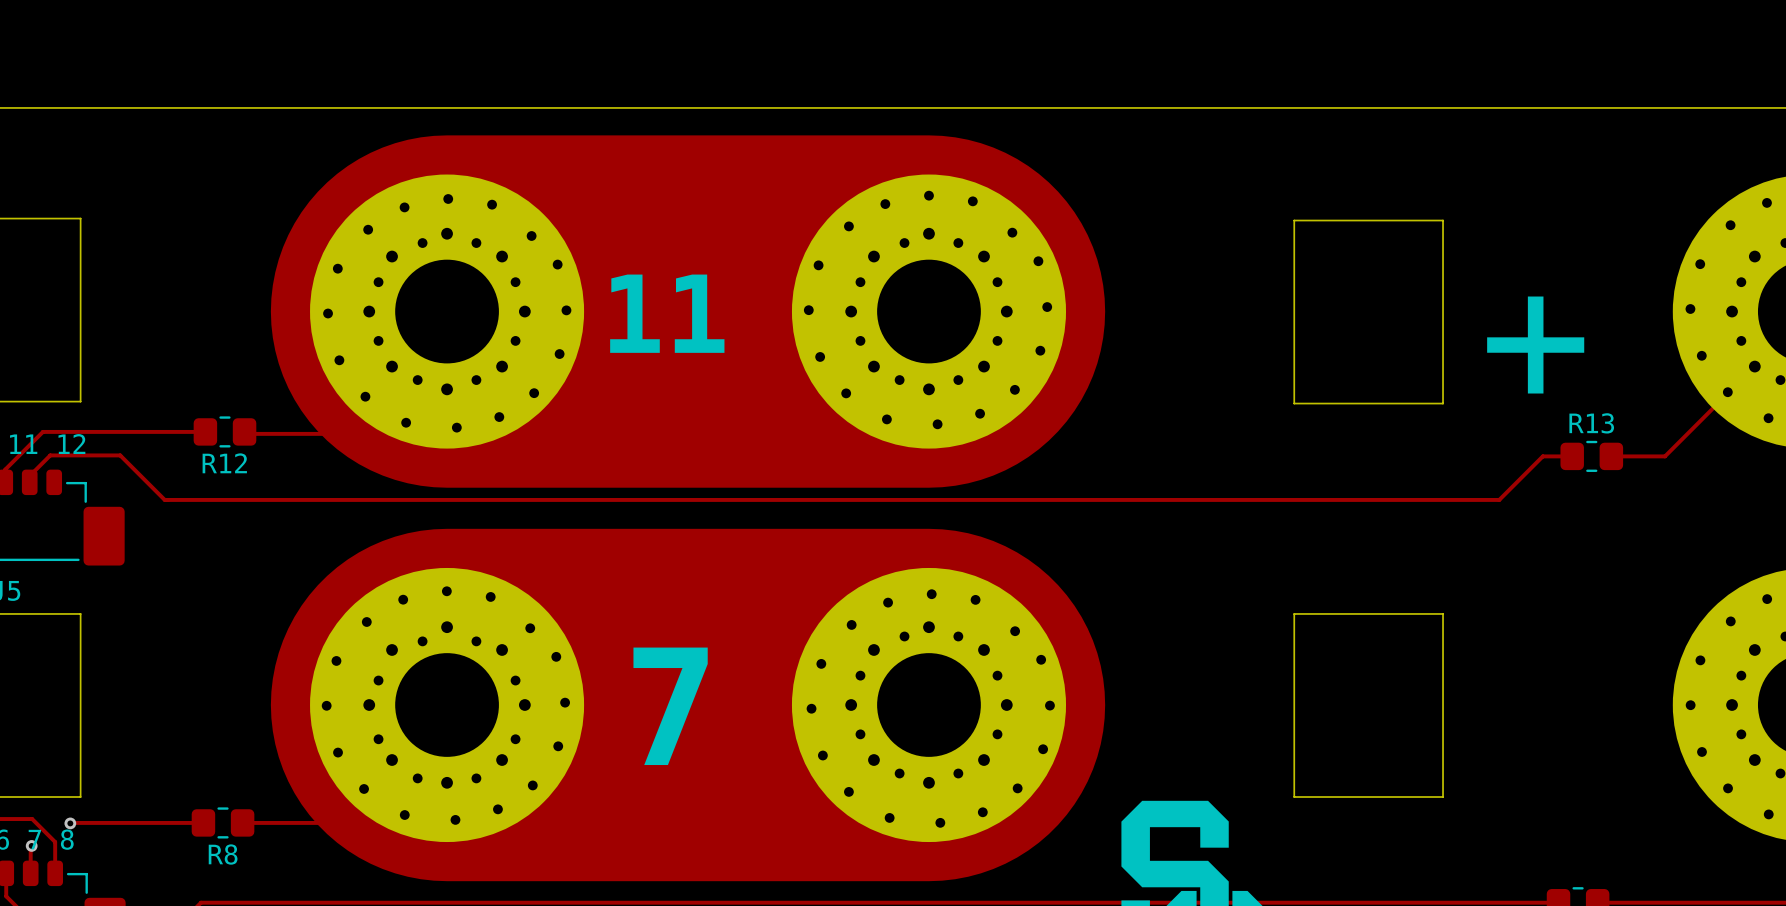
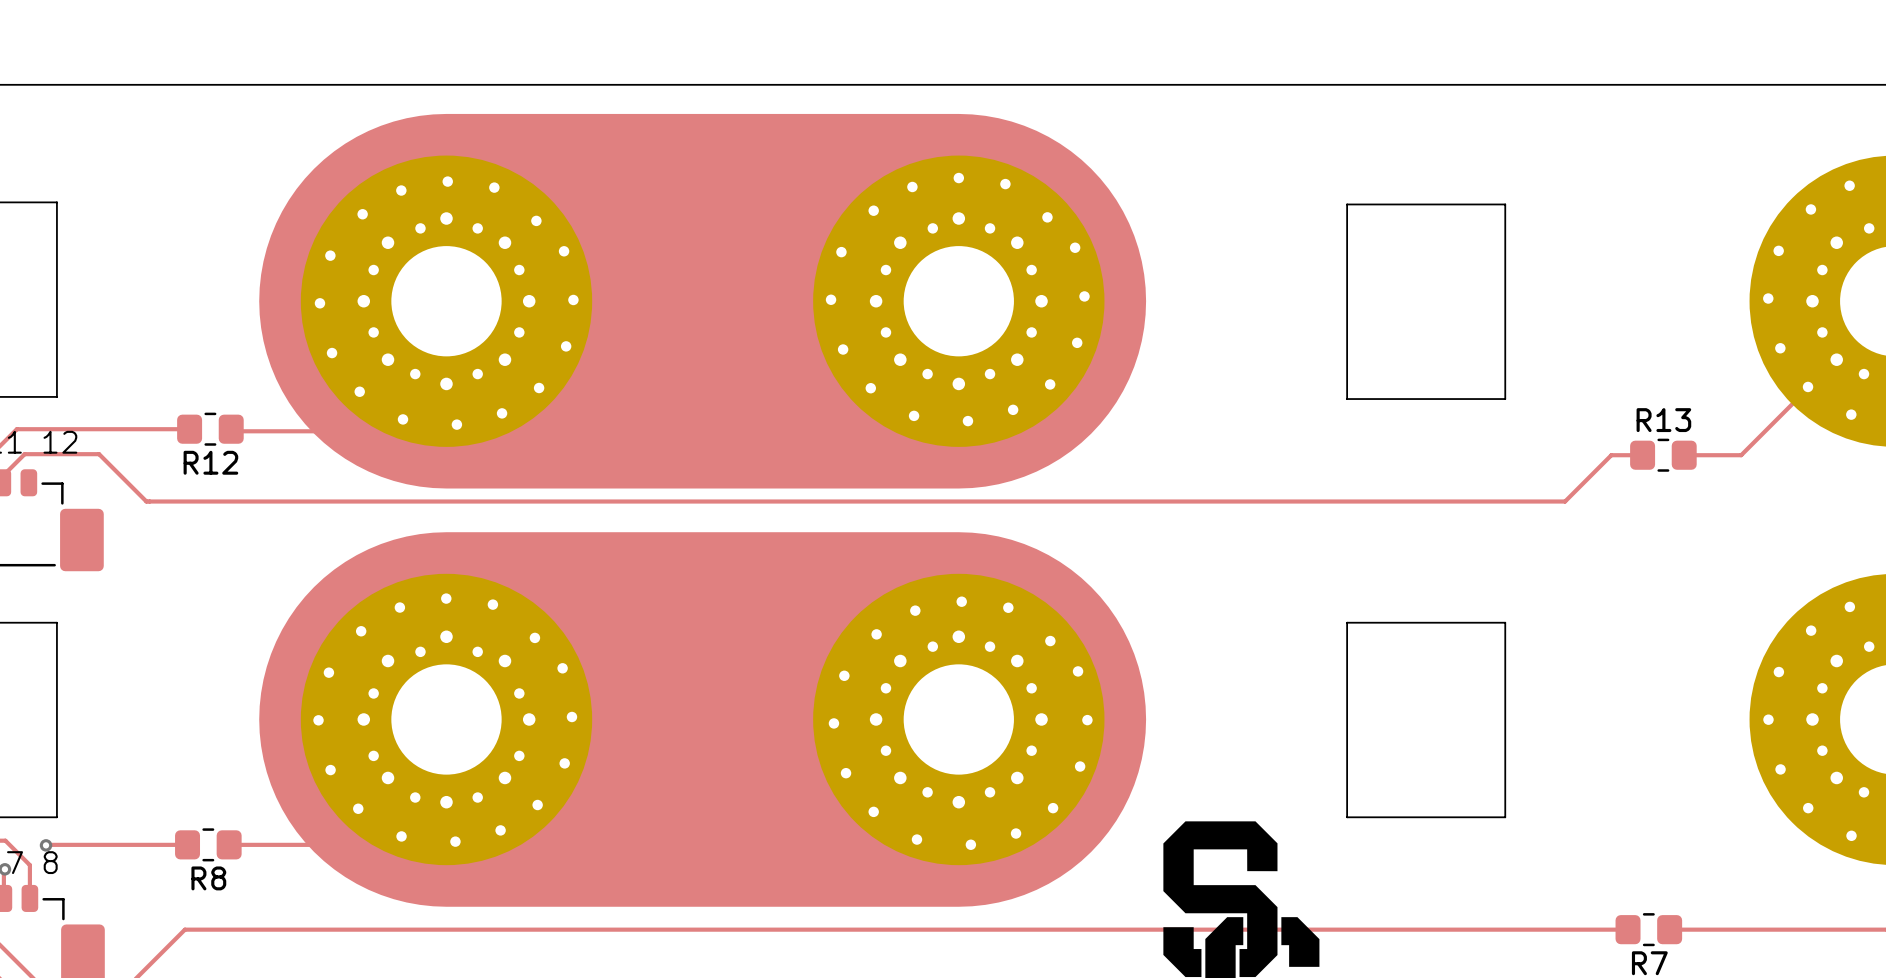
text: 11 (667, 313) -> none
text: + (1535, 345) -> none
text: 7 (670, 706) -> none

